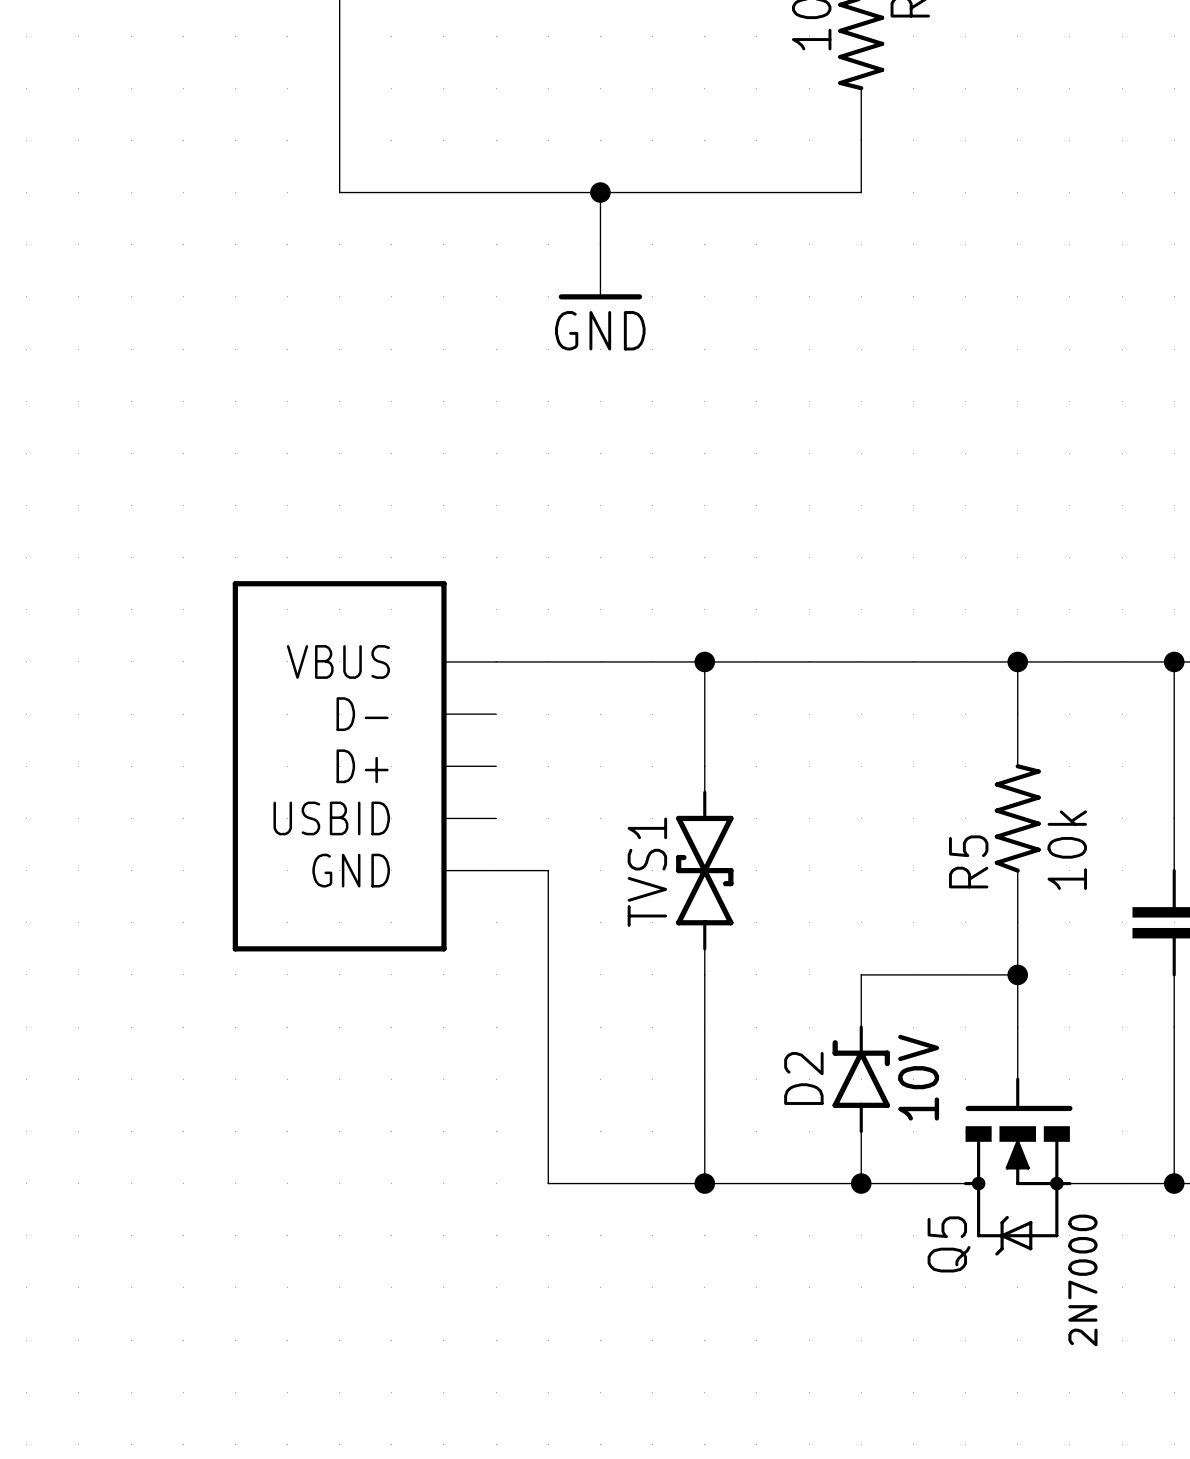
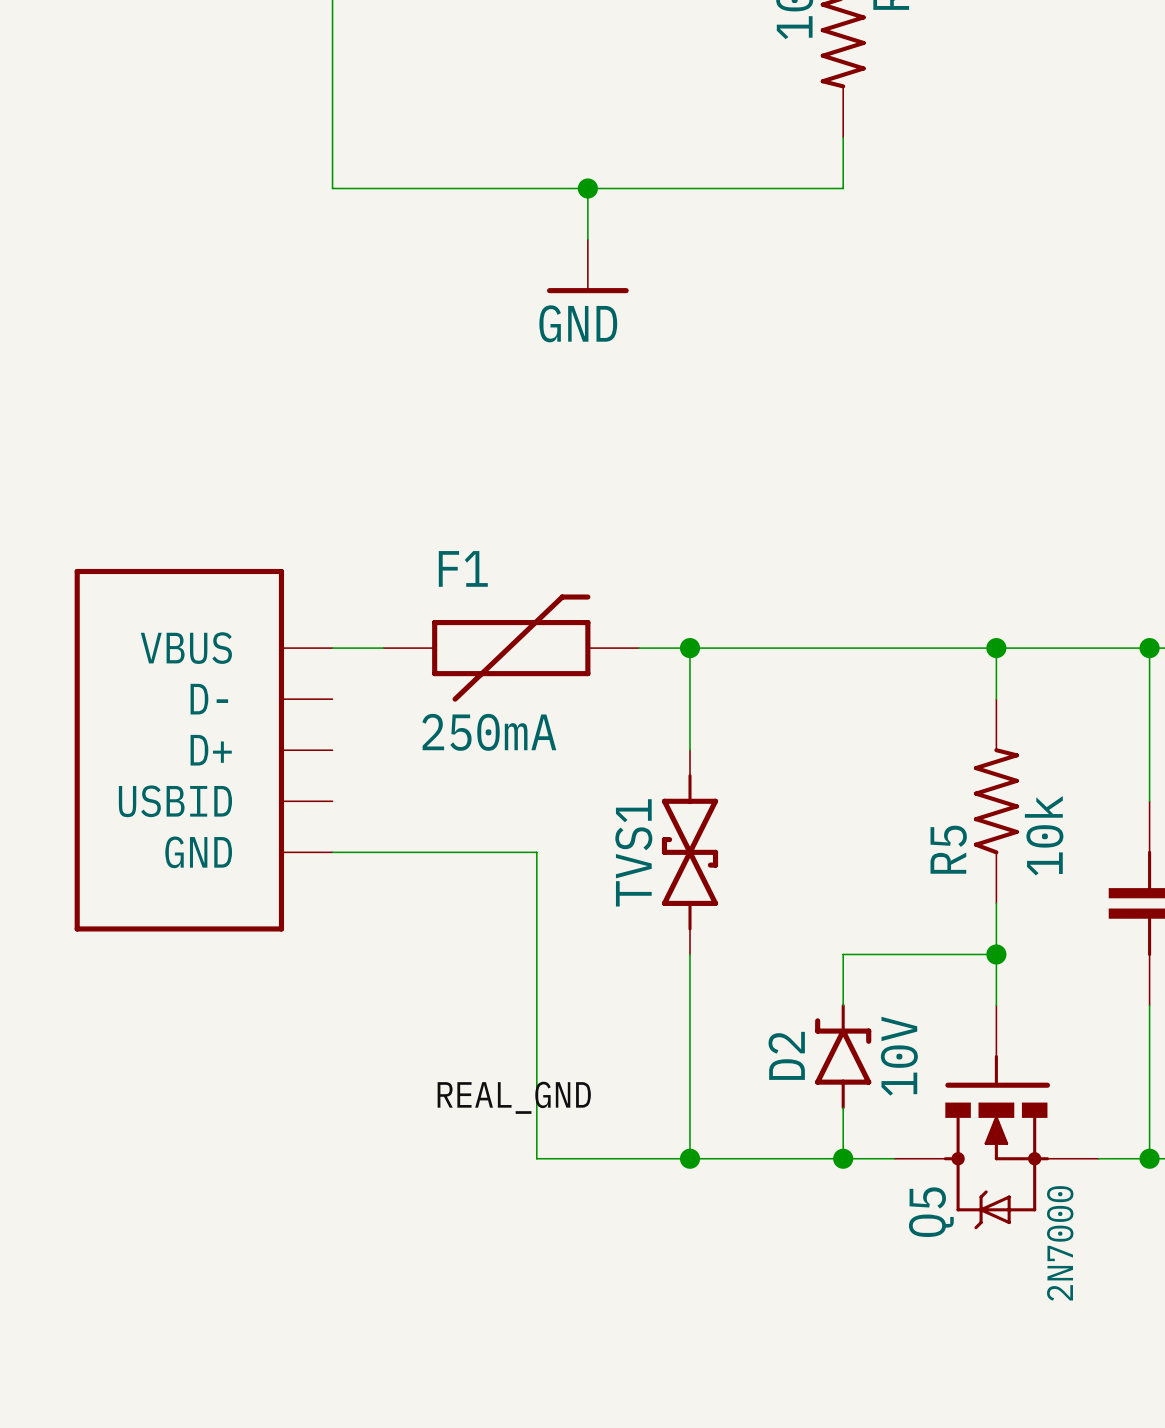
wire: none -> (332, 648) (383, 648)
wire: (496, 661) (652, 661) -> (332, 852) (485, 852)
F1: none -> 250mA (511, 648)
part position: (364, 766) -> (203, 750)
label: none -> REAL_GND (514, 1097)

